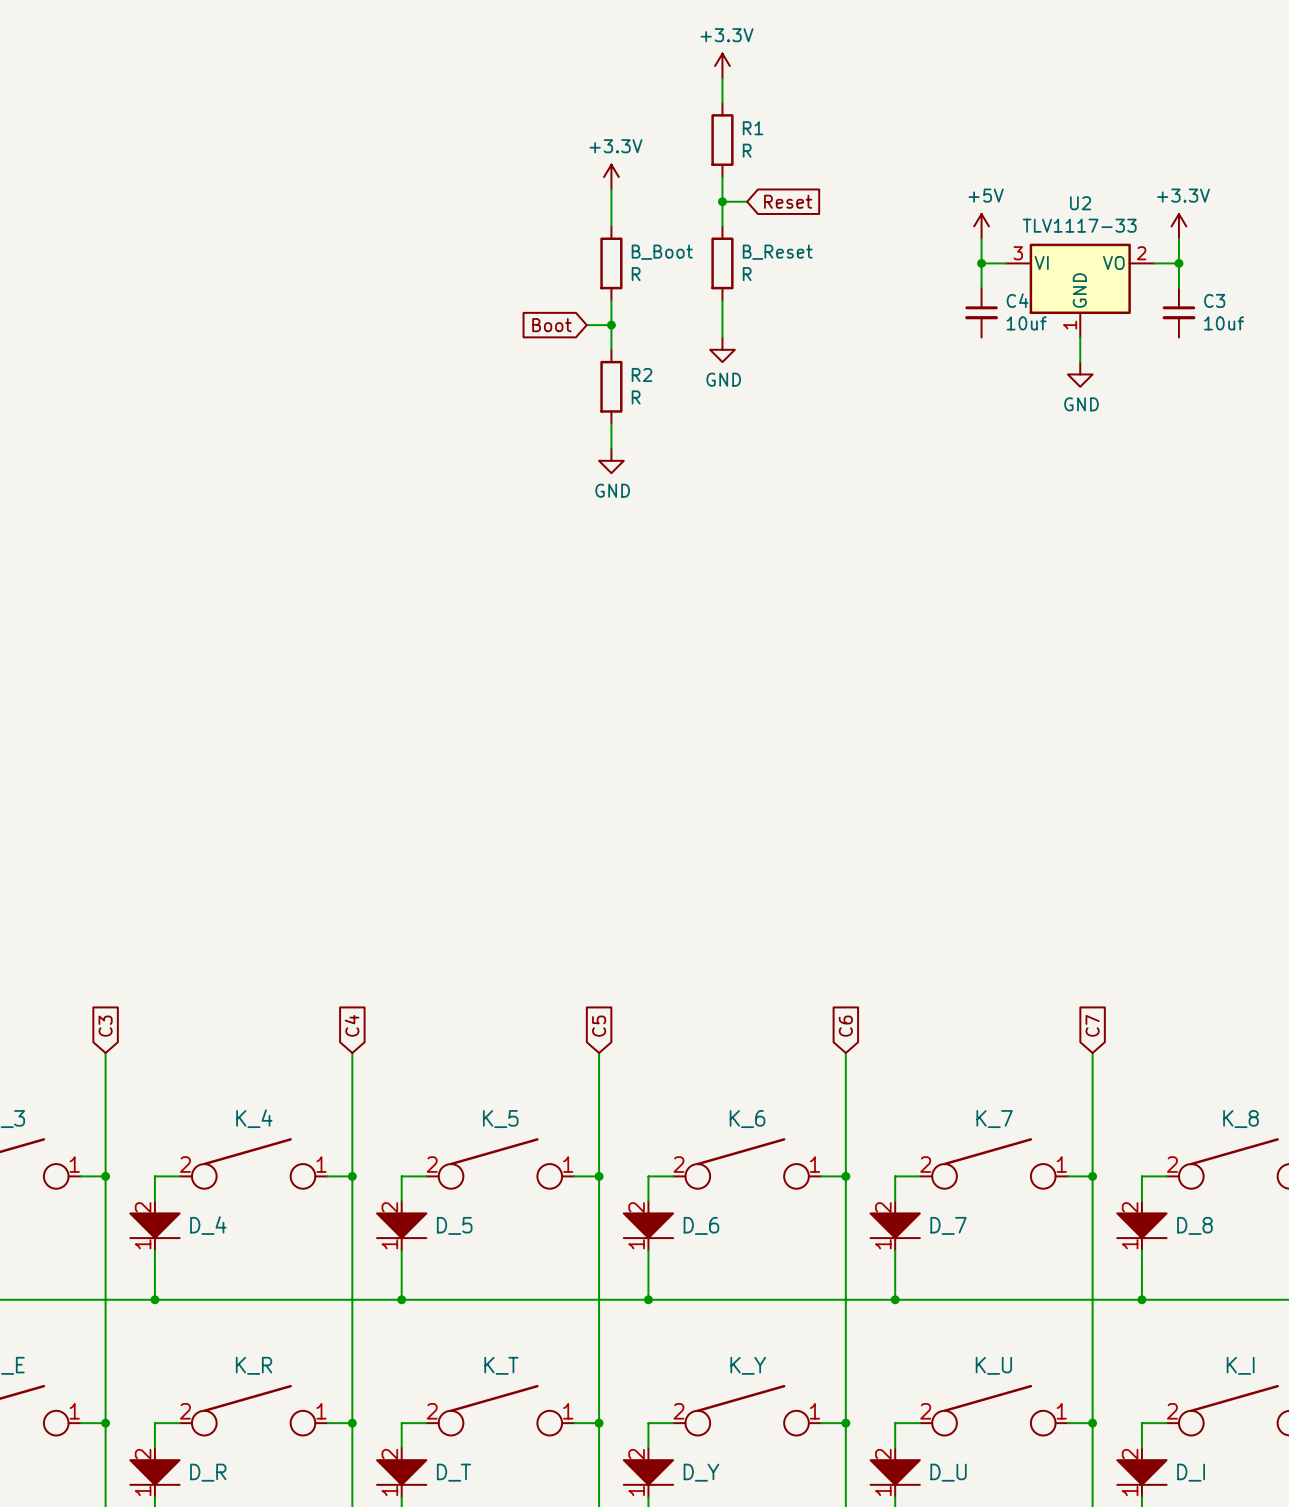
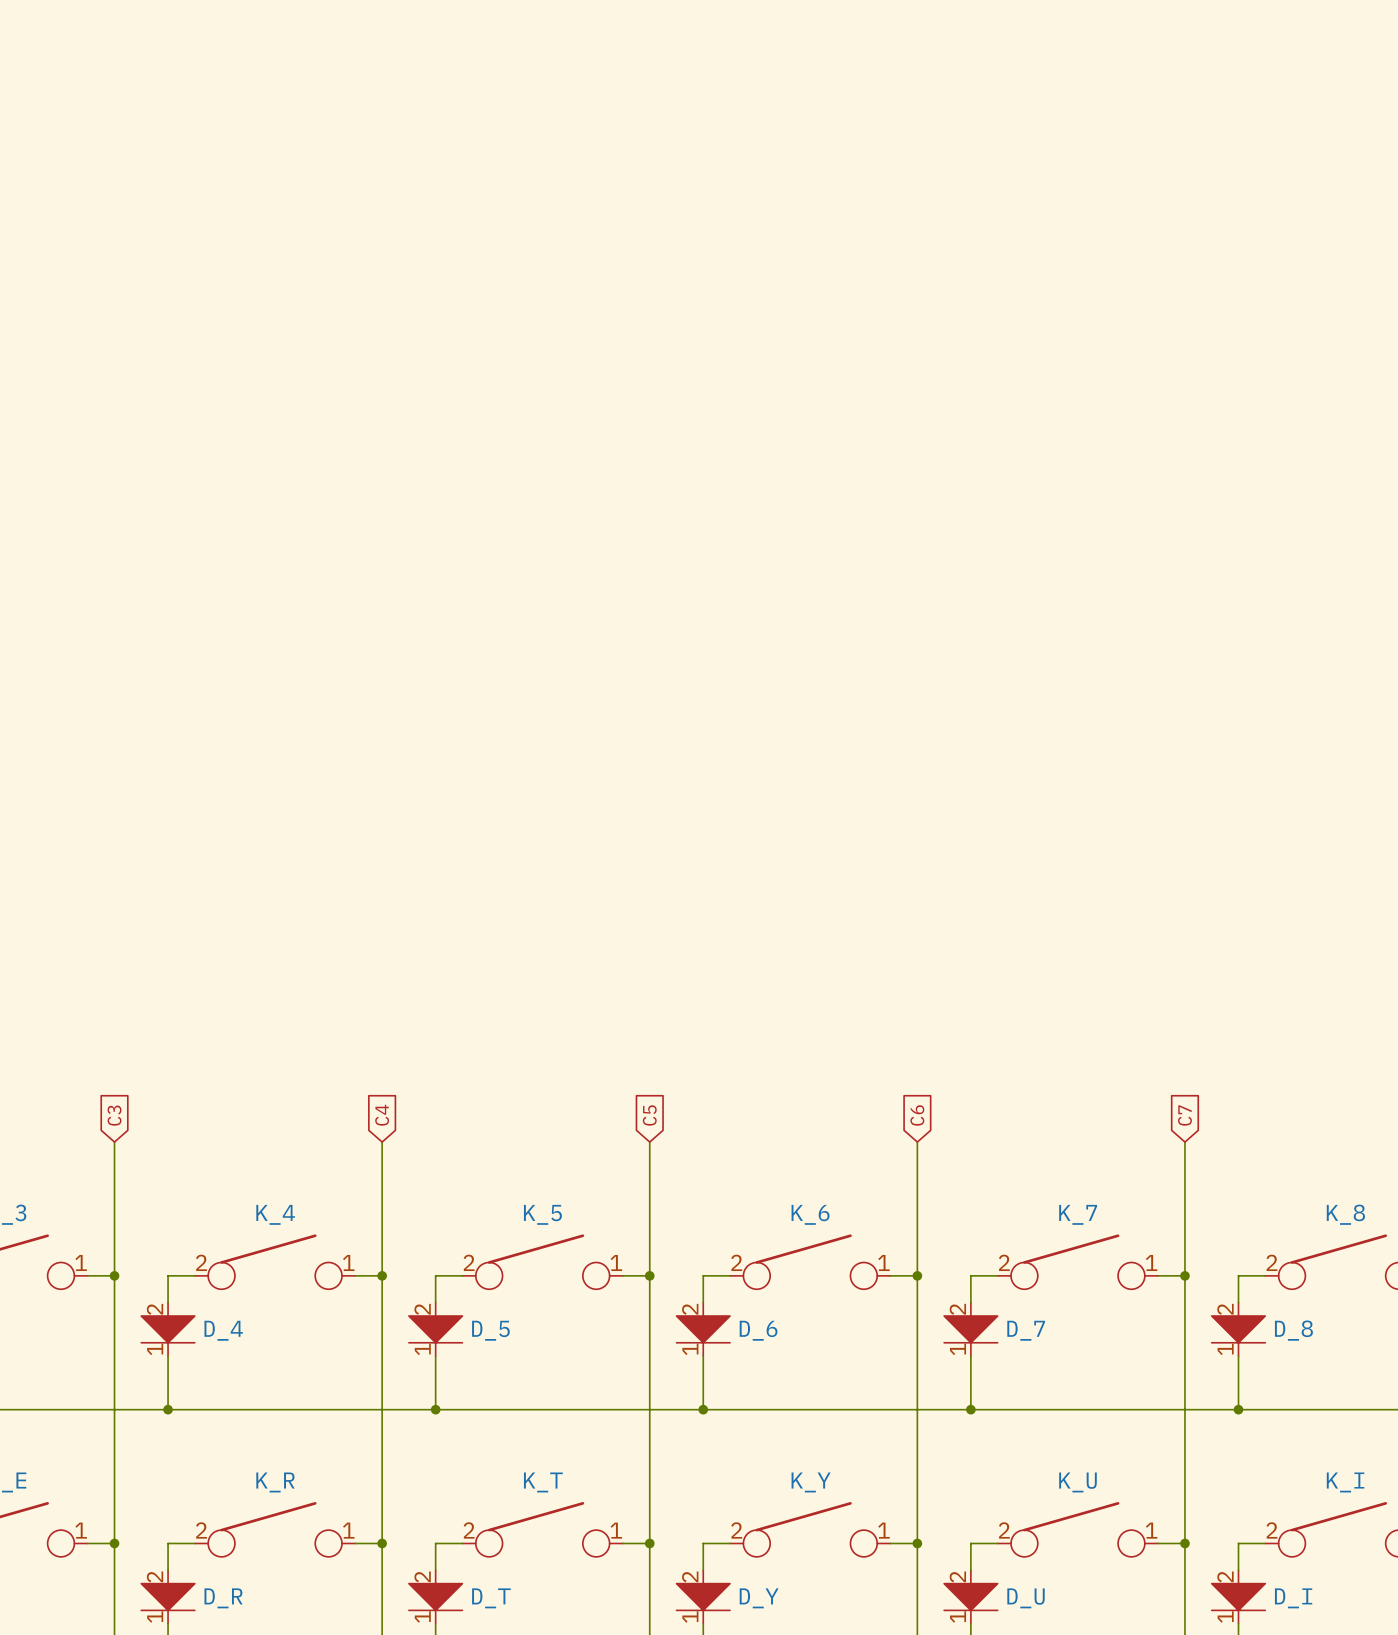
power symbol: +3.3V (722, 66) -> none
wire: (722, 78) (722, 103) -> none
R1: R (722, 140) -> none
power symbol: +3.3V (611, 177) -> none
wire: (722, 177) (722, 226) -> none
wire: (611, 189) (611, 226) -> none
wire: (722, 201) (747, 201) -> none
junction: (722, 201) -> none
global label: Reset (788, 201) -> none
power symbol: +5V (981, 226) -> none
power symbol: +3.3V (1178, 226) -> none
wire: (981, 238) (981, 288) -> none
wire: (1178, 238) (1178, 288) -> none
B_Boot: R (611, 263) -> none
B_Reset: R (722, 263) -> none
wire: (981, 263) (1006, 263) -> none
junction: (981, 263) -> none
wire: (1154, 263) (1178, 263) -> none
junction: (1178, 263) -> none
U2: TLV1117-33 (1080, 290) -> none
wire: (611, 300) (611, 349) -> none
wire: (722, 300) (722, 337) -> none
C4: 10uf (981, 312) -> none
C3: 10uf (1178, 312) -> none
global label: Boot (551, 325) -> none
wire: (586, 325) (611, 325) -> none
junction: (611, 325) -> none
wire: (1080, 337) (1080, 362) -> none
power symbol: GND (722, 349) -> none
power symbol: GND (1080, 374) -> none
R2: R (611, 386) -> none
wire: (611, 423) (611, 448) -> none
power symbol: GND (611, 460) -> none

